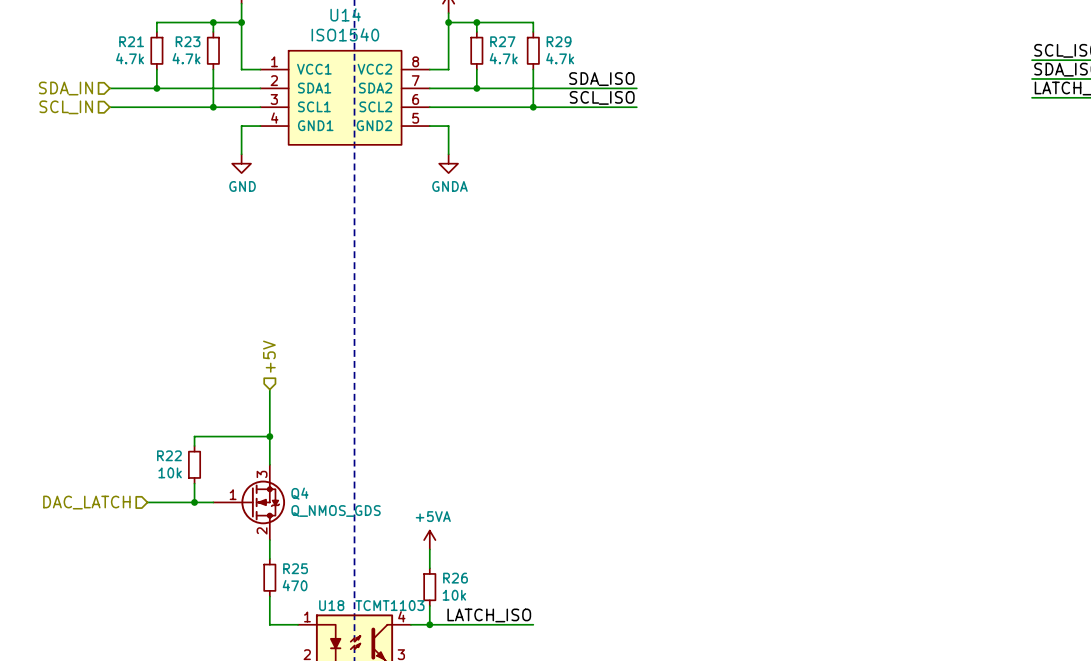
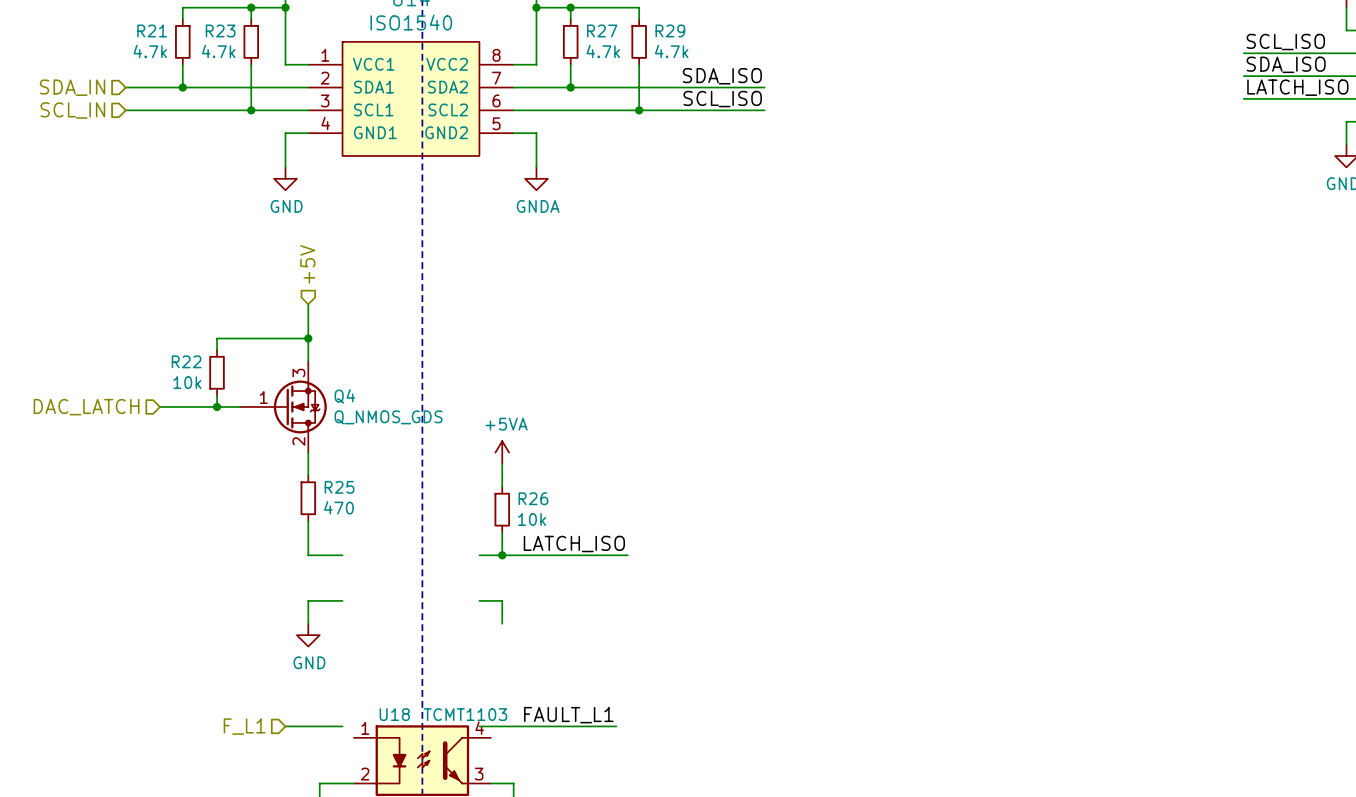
wire: none -> (308, 304) (308, 361)
junction: none -> (308, 338)
wire: none -> (217, 395) (217, 406)
junction: none -> (217, 406)
hierarchical label position: +5V (269, 356) -> +5V (307, 264)
wire: (269, 389) (269, 464) -> none
wire: (269, 436) (194, 436) (194, 445) -> (308, 338) (217, 338) (217, 349)
junction: (269, 436) -> none
R22 position: (194, 464) -> (217, 372)
junction: none -> (502, 555)
wire: (194, 483) (194, 502) -> none
hierarchical label position: DAC_LATCH (86, 502) -> DAC_LATCH (86, 407)
wire: (147, 502) (213, 502) -> (159, 406) (239, 406)
junction: (194, 502) -> none
Q4 position: (249, 502) -> (283, 406)
wire: none -> (342, 600) (308, 600) (308, 623)
wire: none -> (479, 600) (502, 600) (502, 623)
power symbol: none -> GND (308, 635)
wire: (269, 540) (269, 558) -> (308, 452) (308, 475)
power symbol position: +5VA (429, 540) -> +5VA (502, 452)
wire: (429, 549) (429, 568) -> (502, 464) (502, 486)
R25 position: (269, 577) -> (308, 498)
R26 position: (429, 587) -> (502, 509)
wire: (269, 596) (269, 624) (298, 624) -> (308, 521) (308, 555) (342, 555)
wire: (429, 605) (429, 624) -> (502, 532) (502, 555)
label: none -> FAULT_L1 (568, 715)
hierarchical label: none -> F_L1 (244, 726)
wire: none -> (285, 726) (342, 726)
wire: none -> (479, 726) (616, 726)
label position: LATCH_ISO (489, 615) -> LATCH_ISO (574, 544)
wire: (410, 624) (533, 624) -> (479, 555) (627, 555)
junction: (429, 624) -> none

